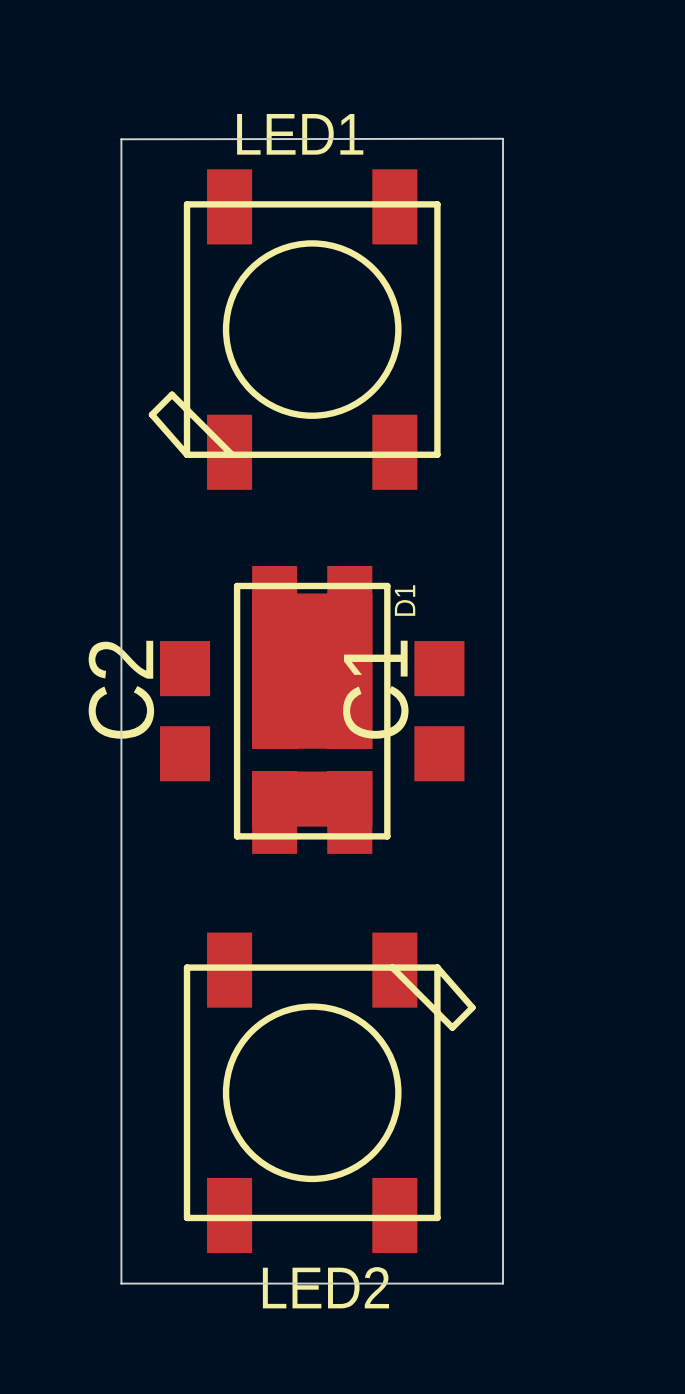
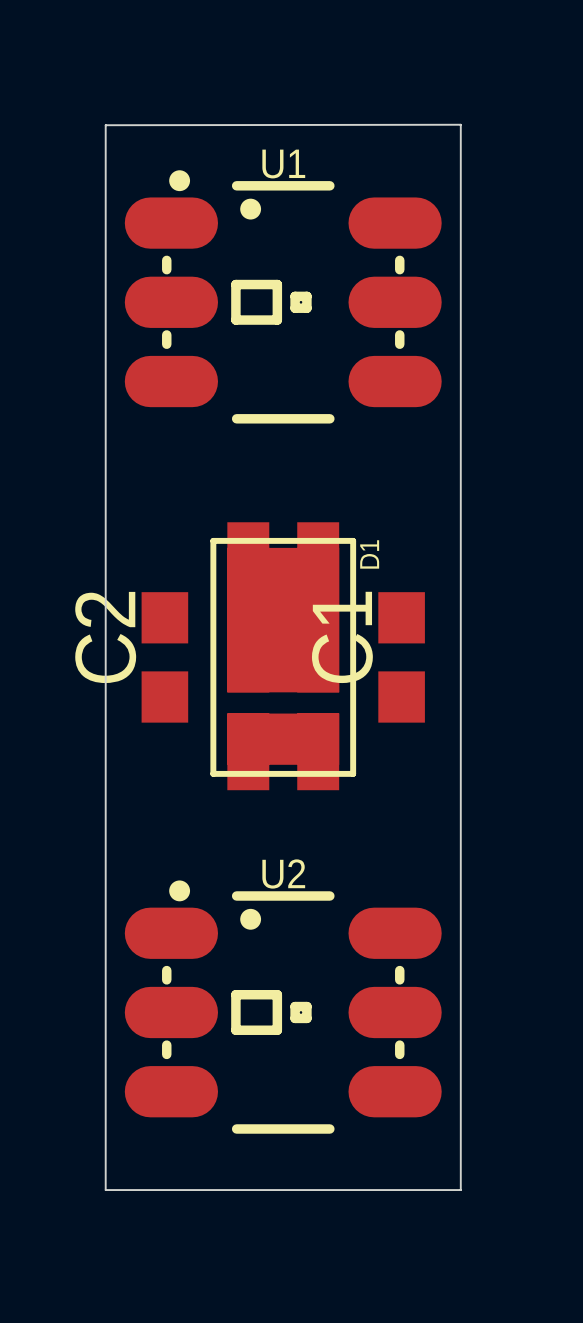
U1: none -> (283, 296)
LED1: (294, 329) -> none
U2: none -> (283, 1007)
LED2: (329, 1092) -> none

